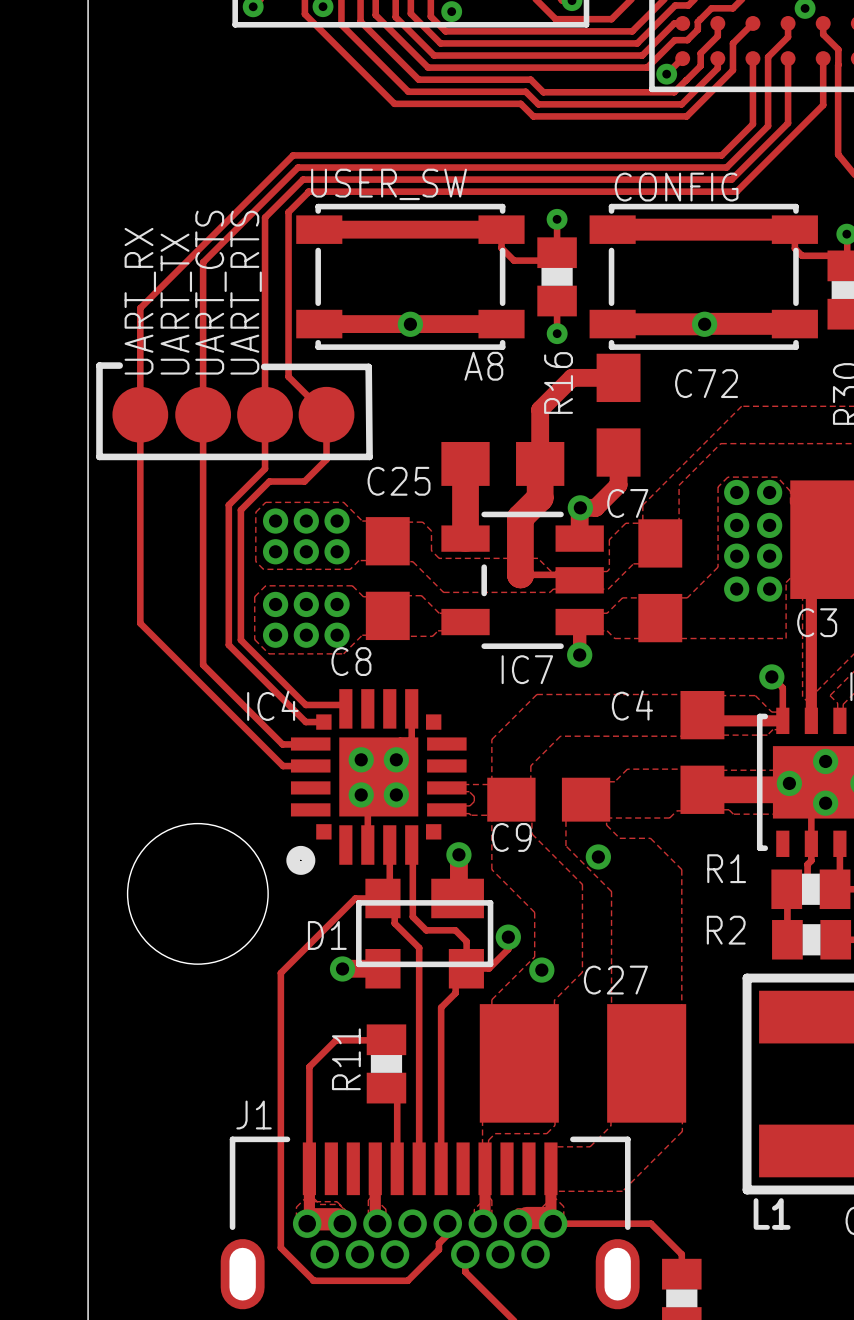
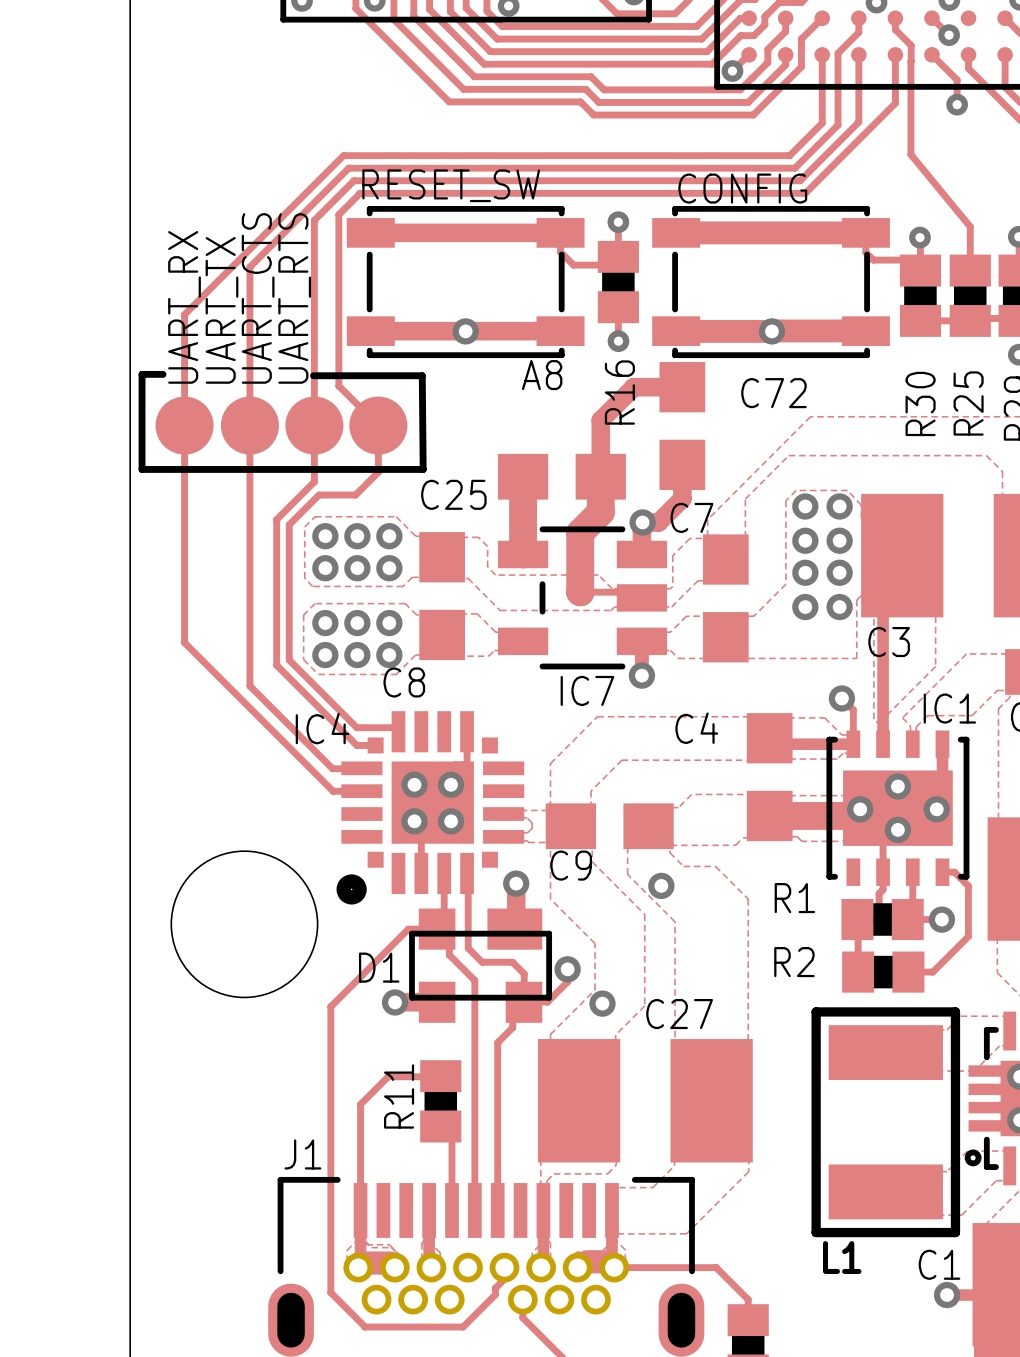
USER_SW name: USER_SW (389, 184) -> RESET_SW (451, 185)

